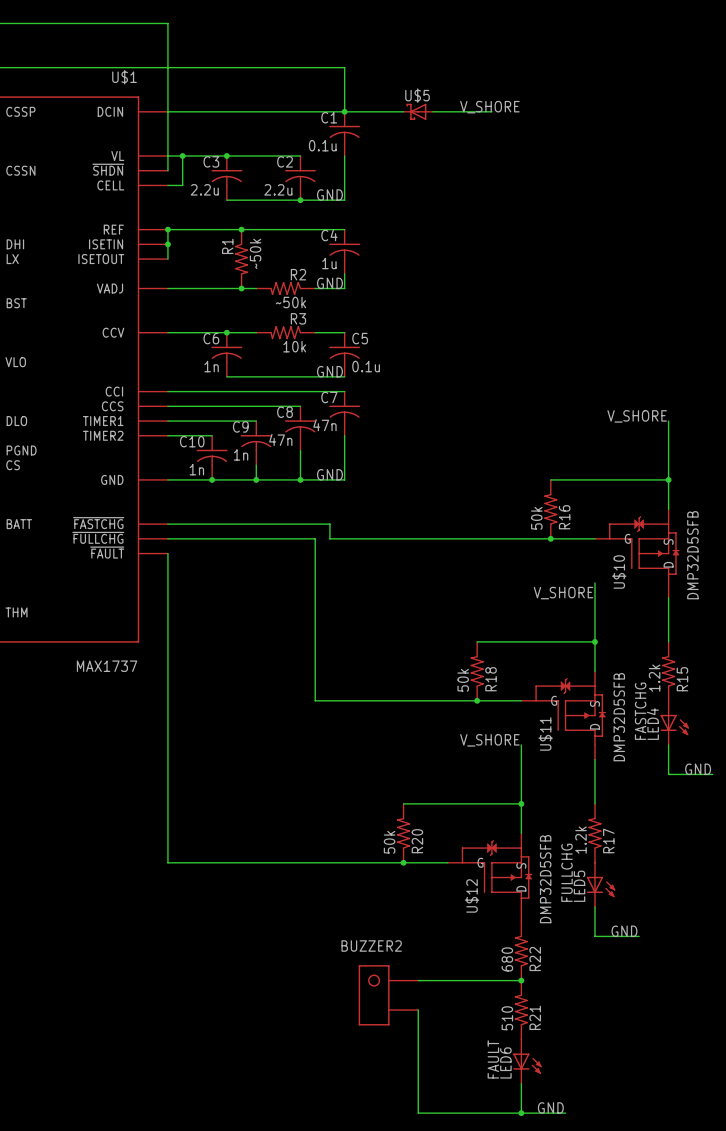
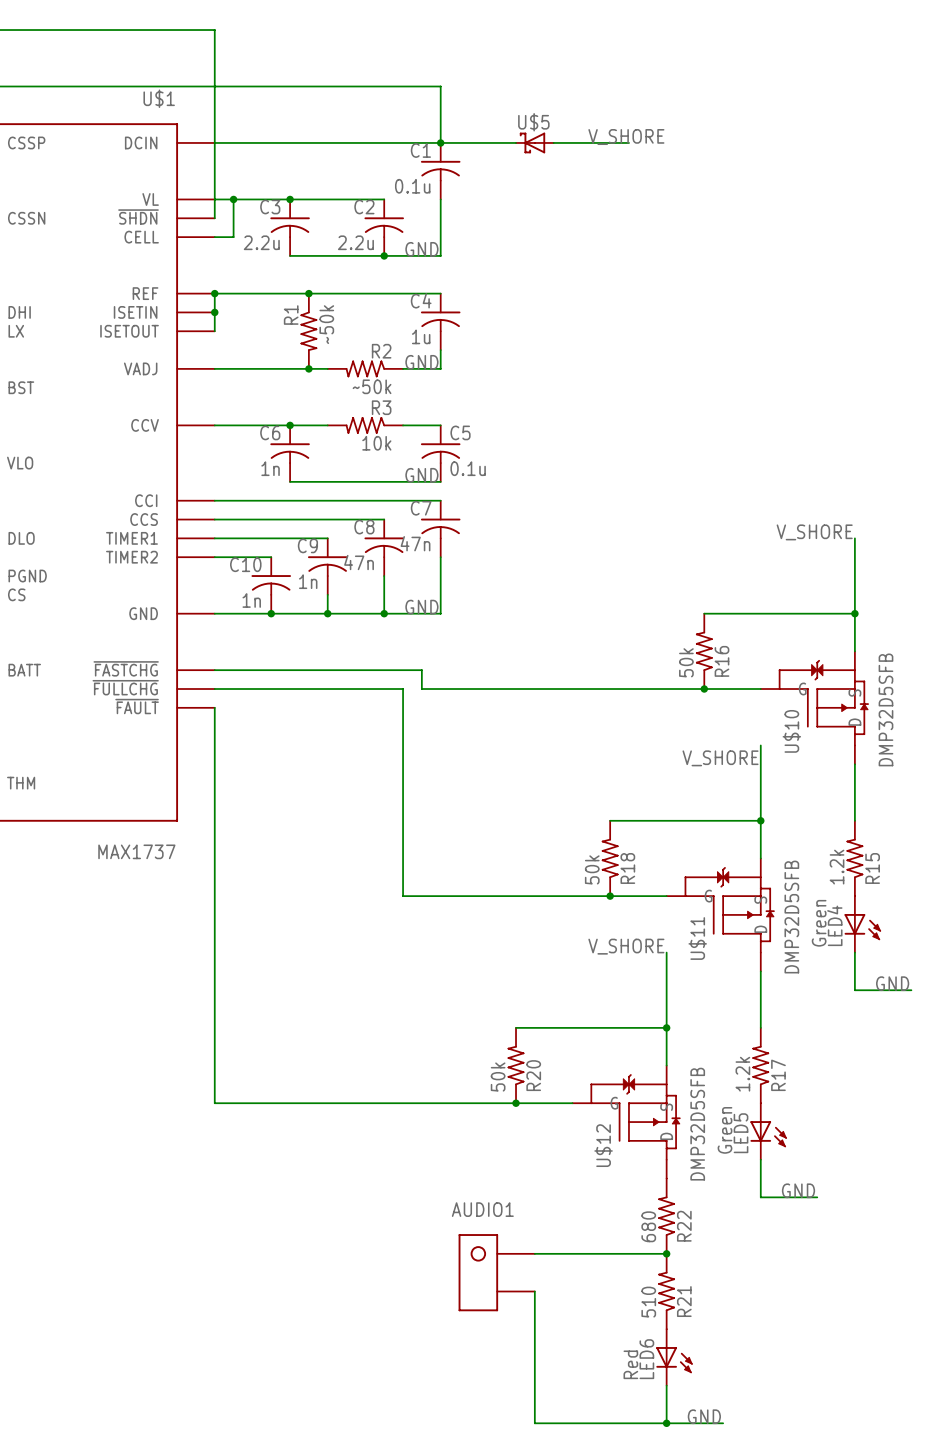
LED4 value: FASTCHG (640, 711) -> Green (819, 923)
LED5 value: FULLCHG (567, 872) -> Green (725, 1130)
BUZZER2 name: BUZZER2 (371, 945) -> AUDIO1 (482, 1209)
LED6 value: FAULT (493, 1059) -> Red (630, 1364)

